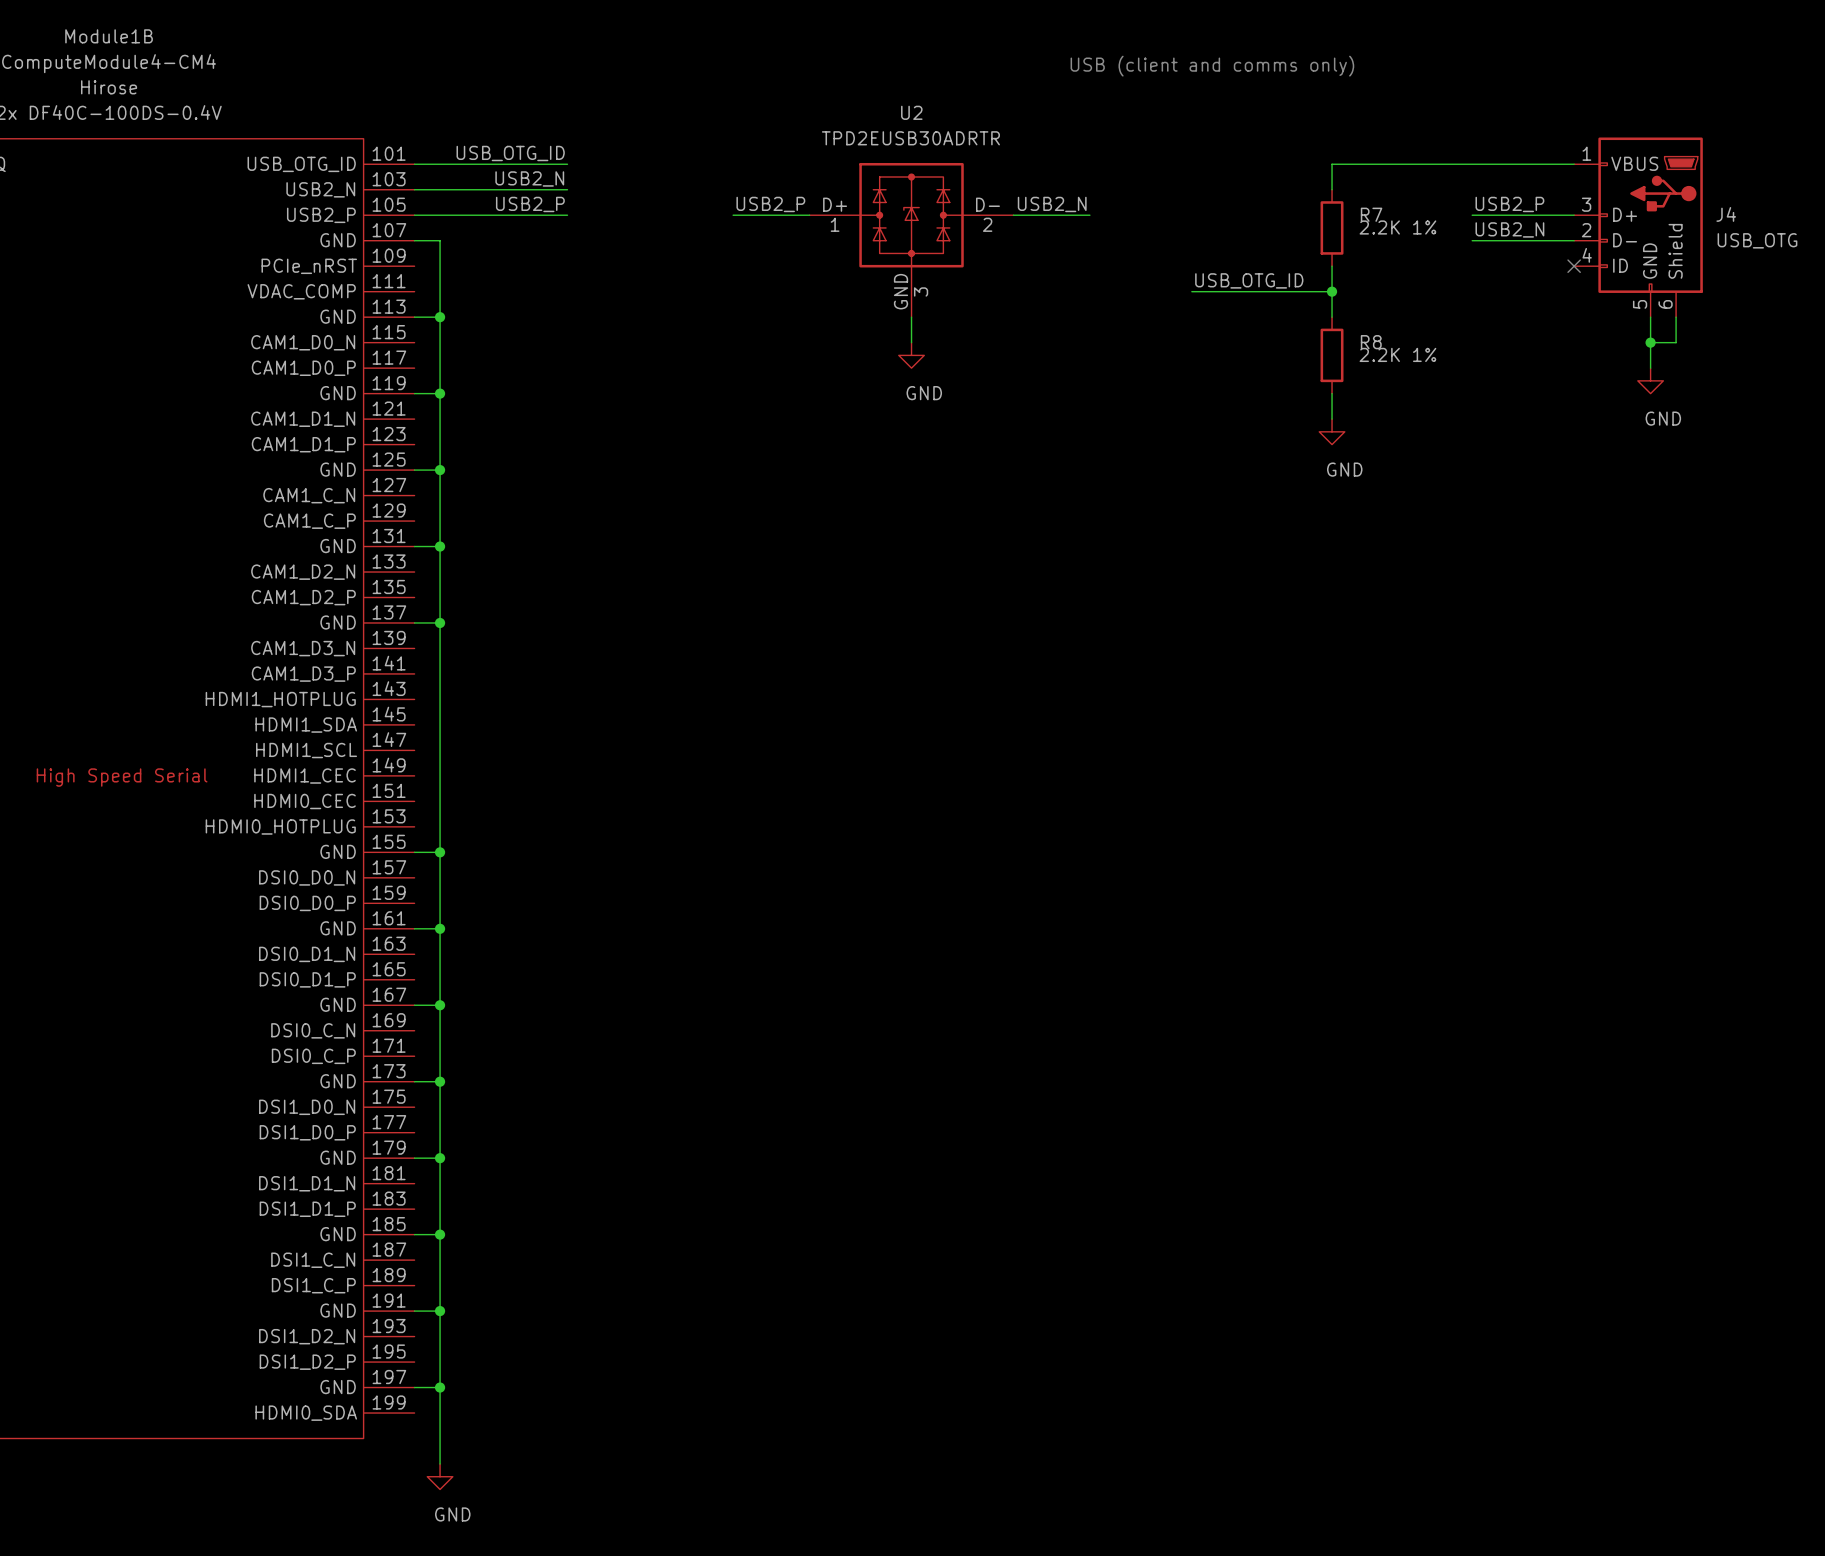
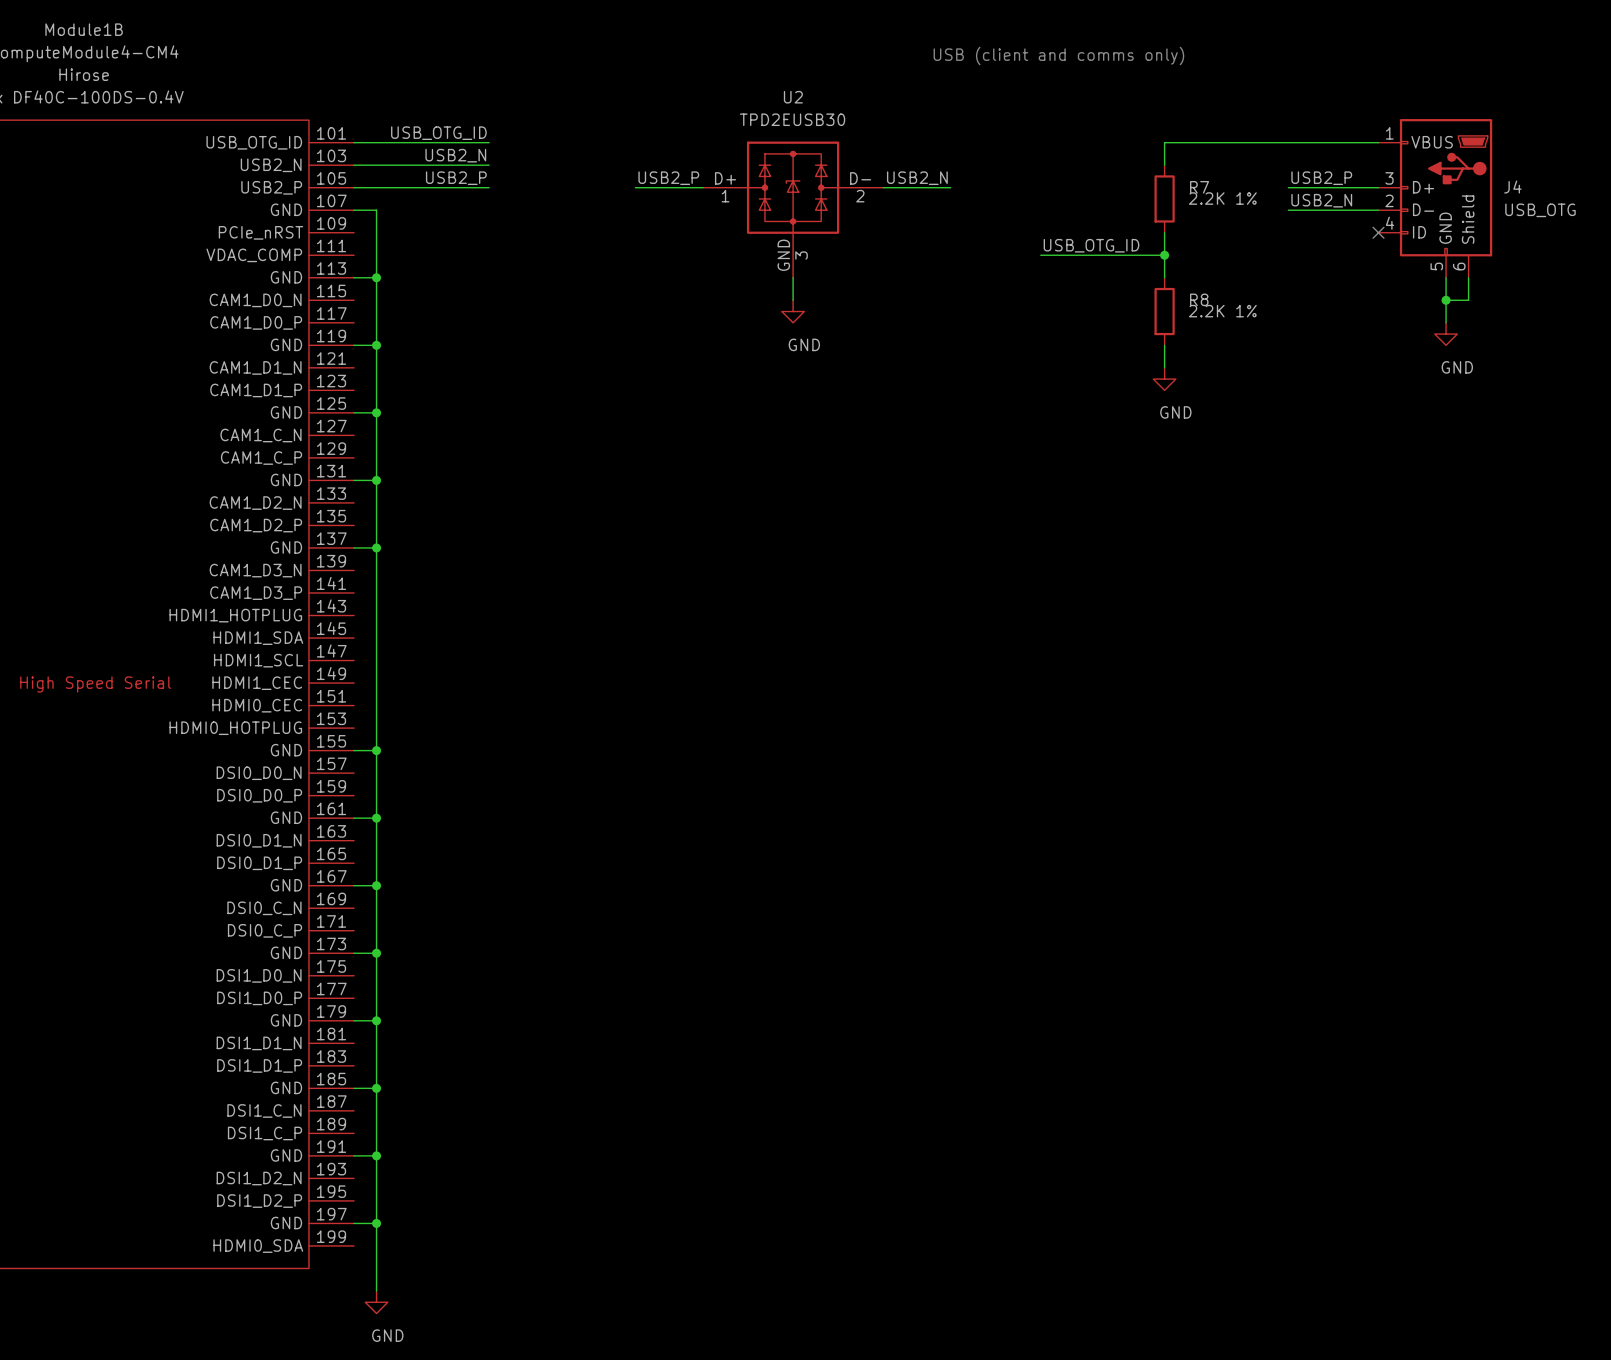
U2 value: TPD2EUSB30ADRTR (910, 138) -> TPD2EUSB30 (792, 119)

